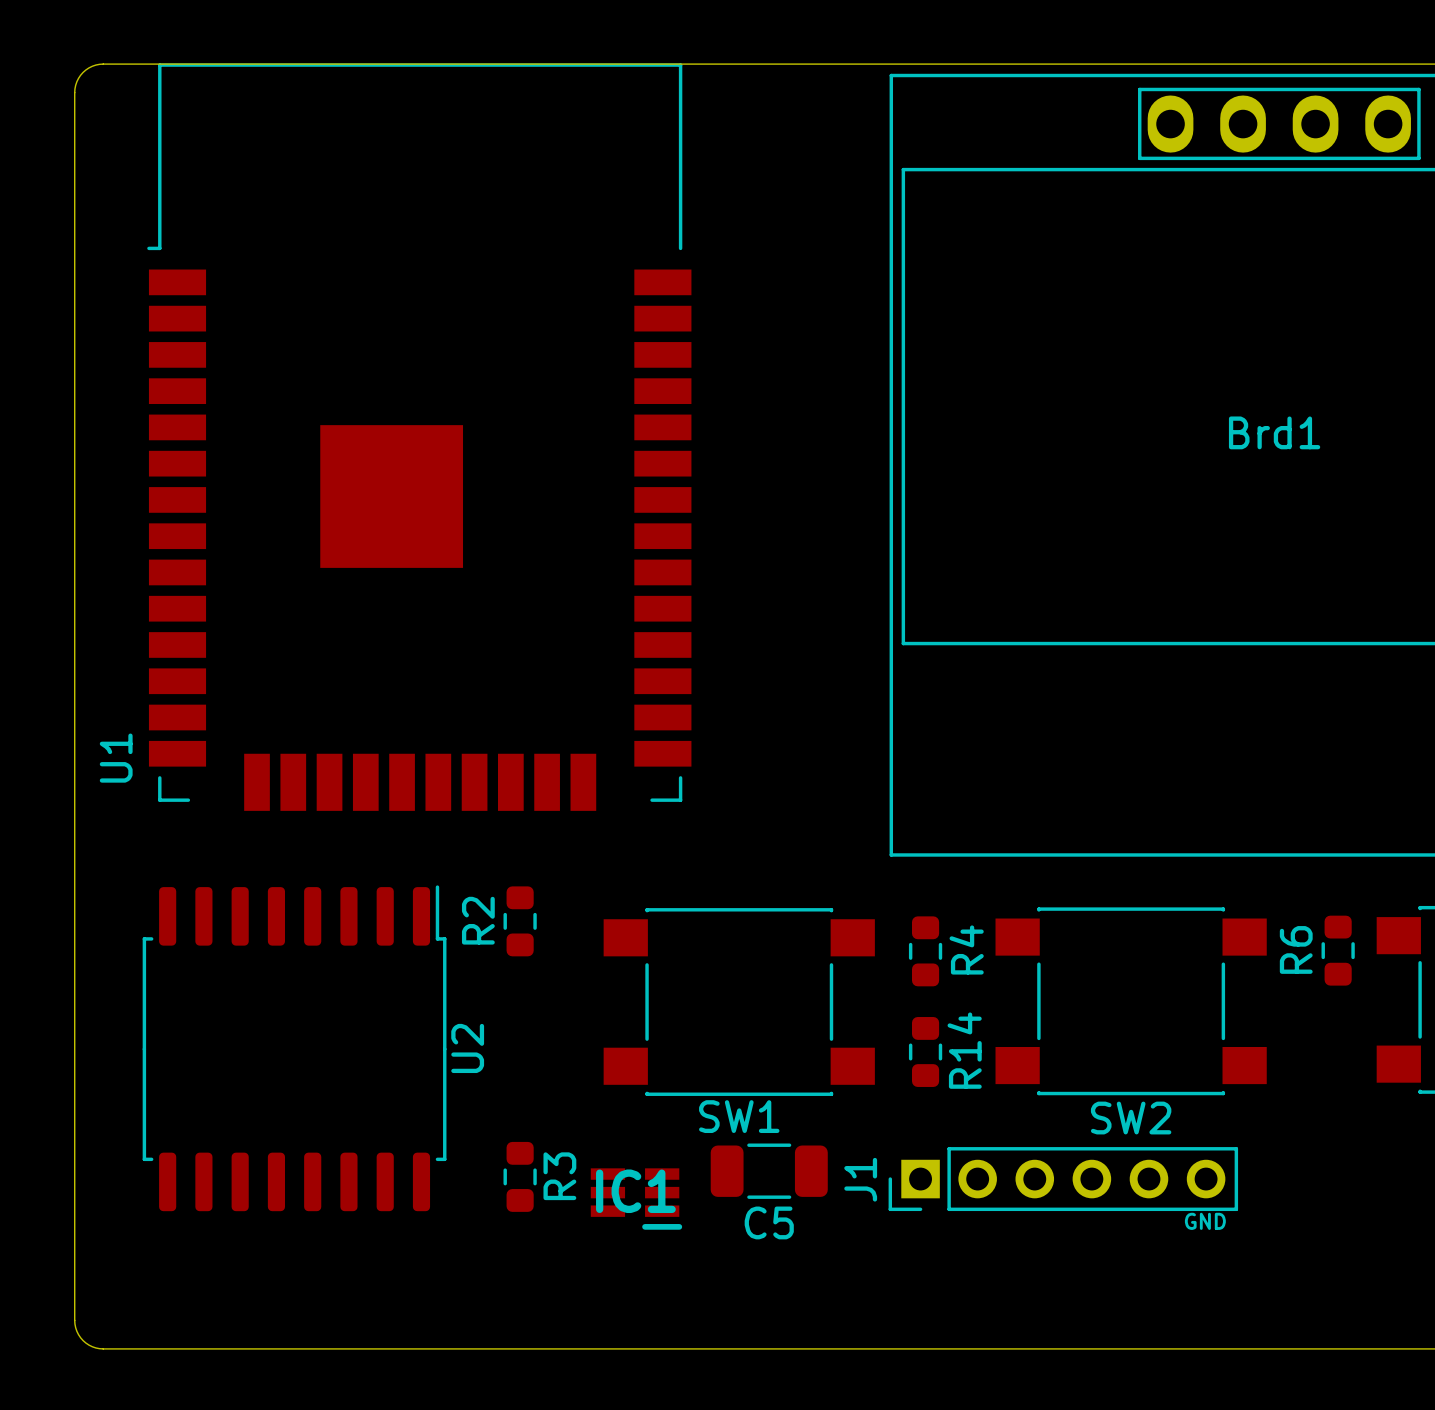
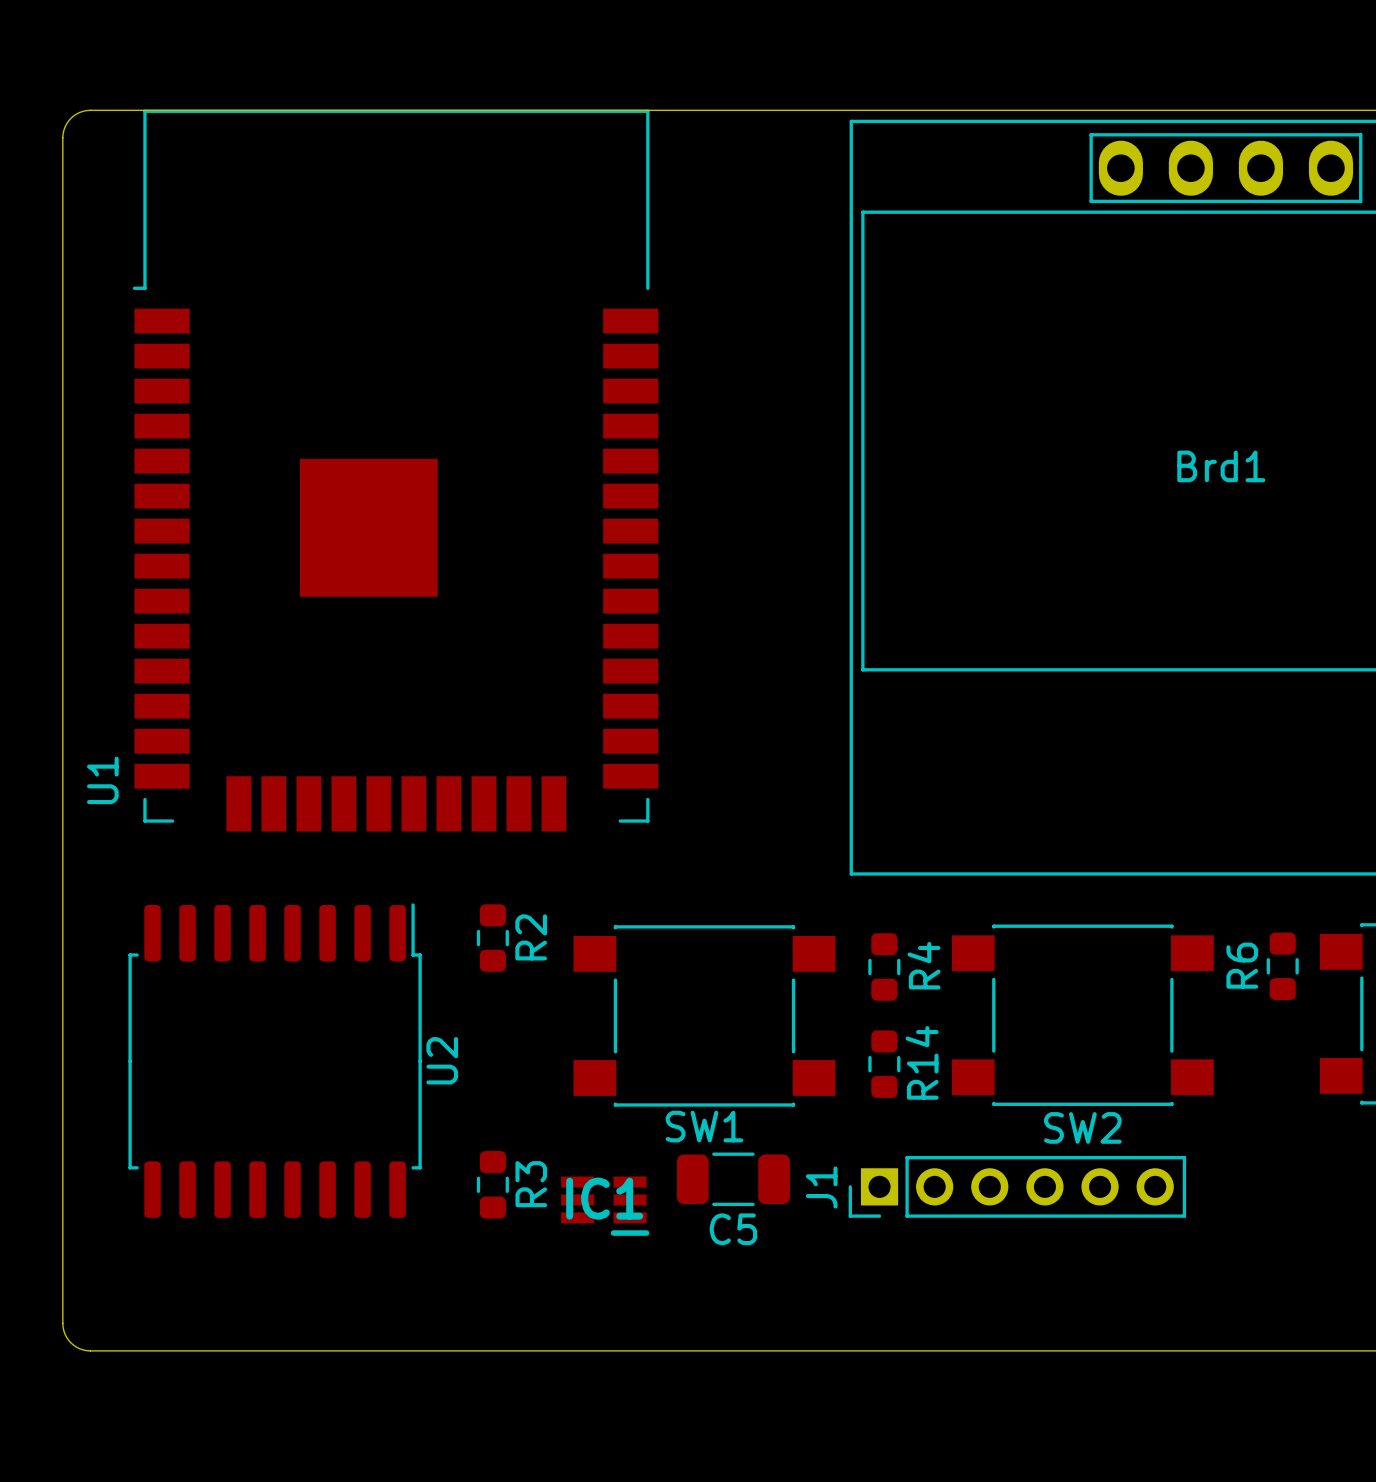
R2 name position: R2 (478, 920) -> R2 (531, 937)
text: GND (1205, 1221) -> none

